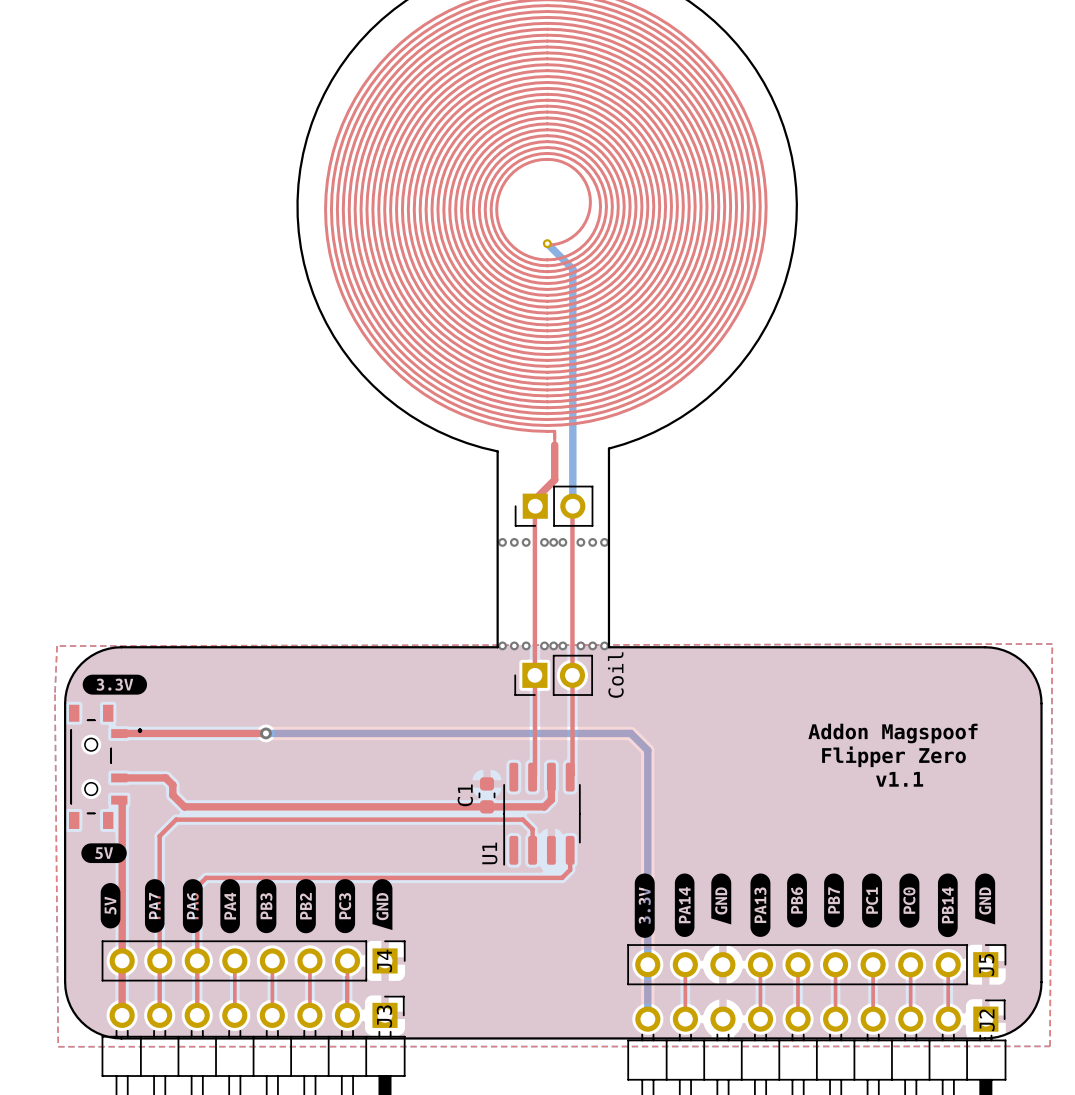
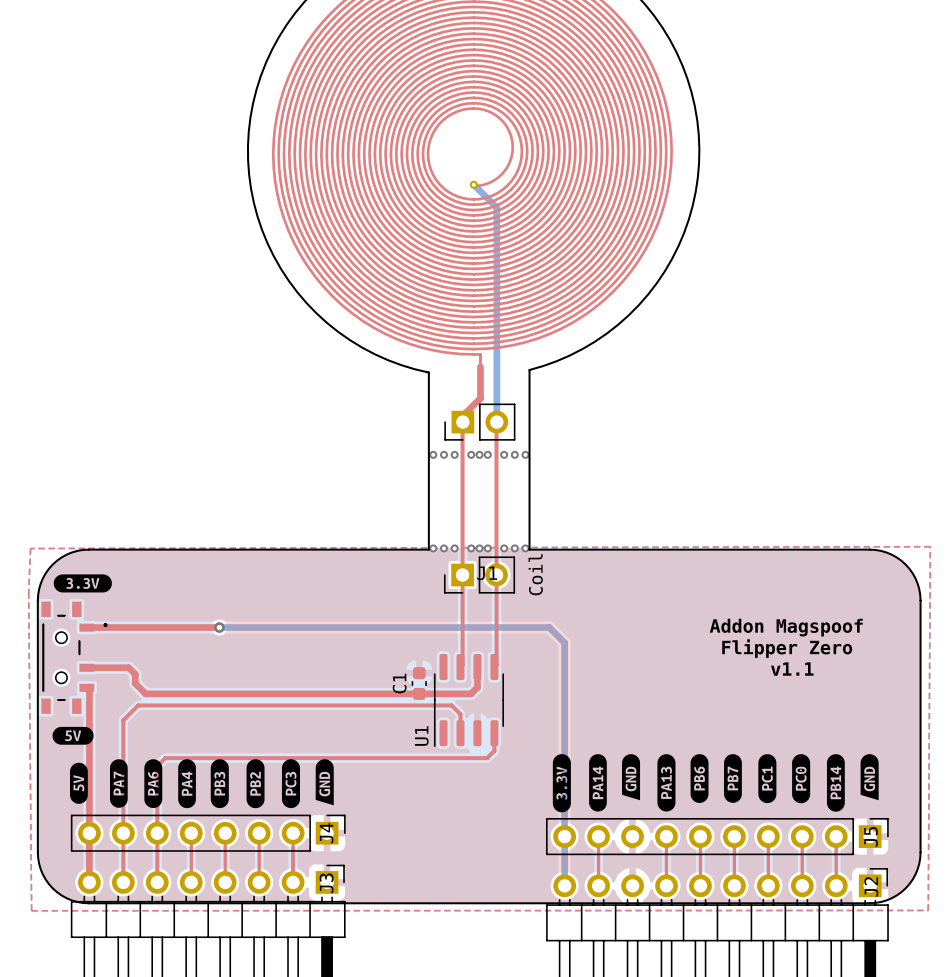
J1 name: none -> J1 (487, 573)

